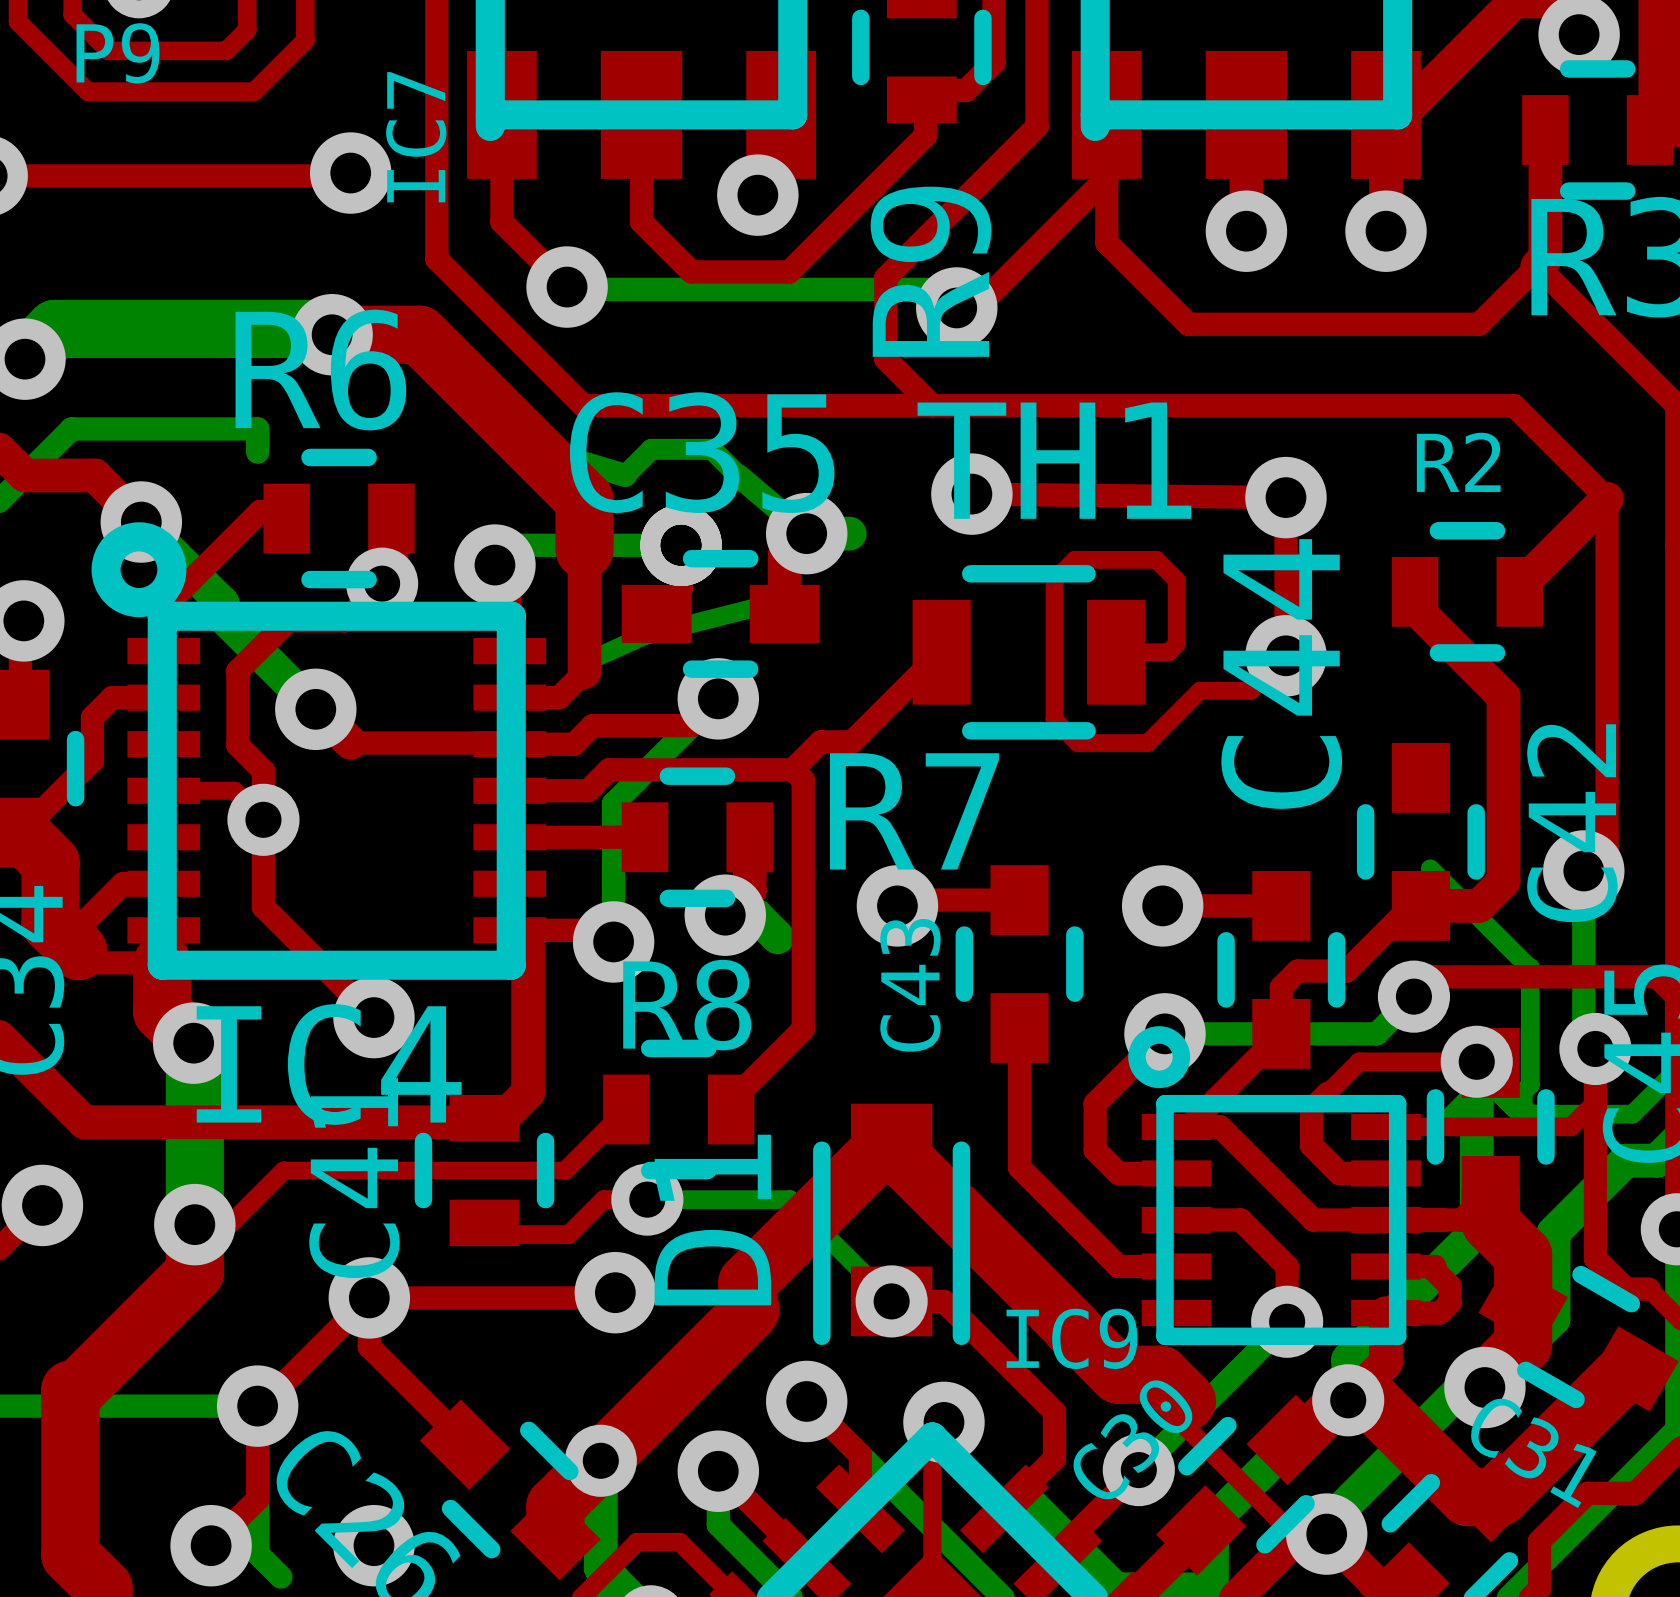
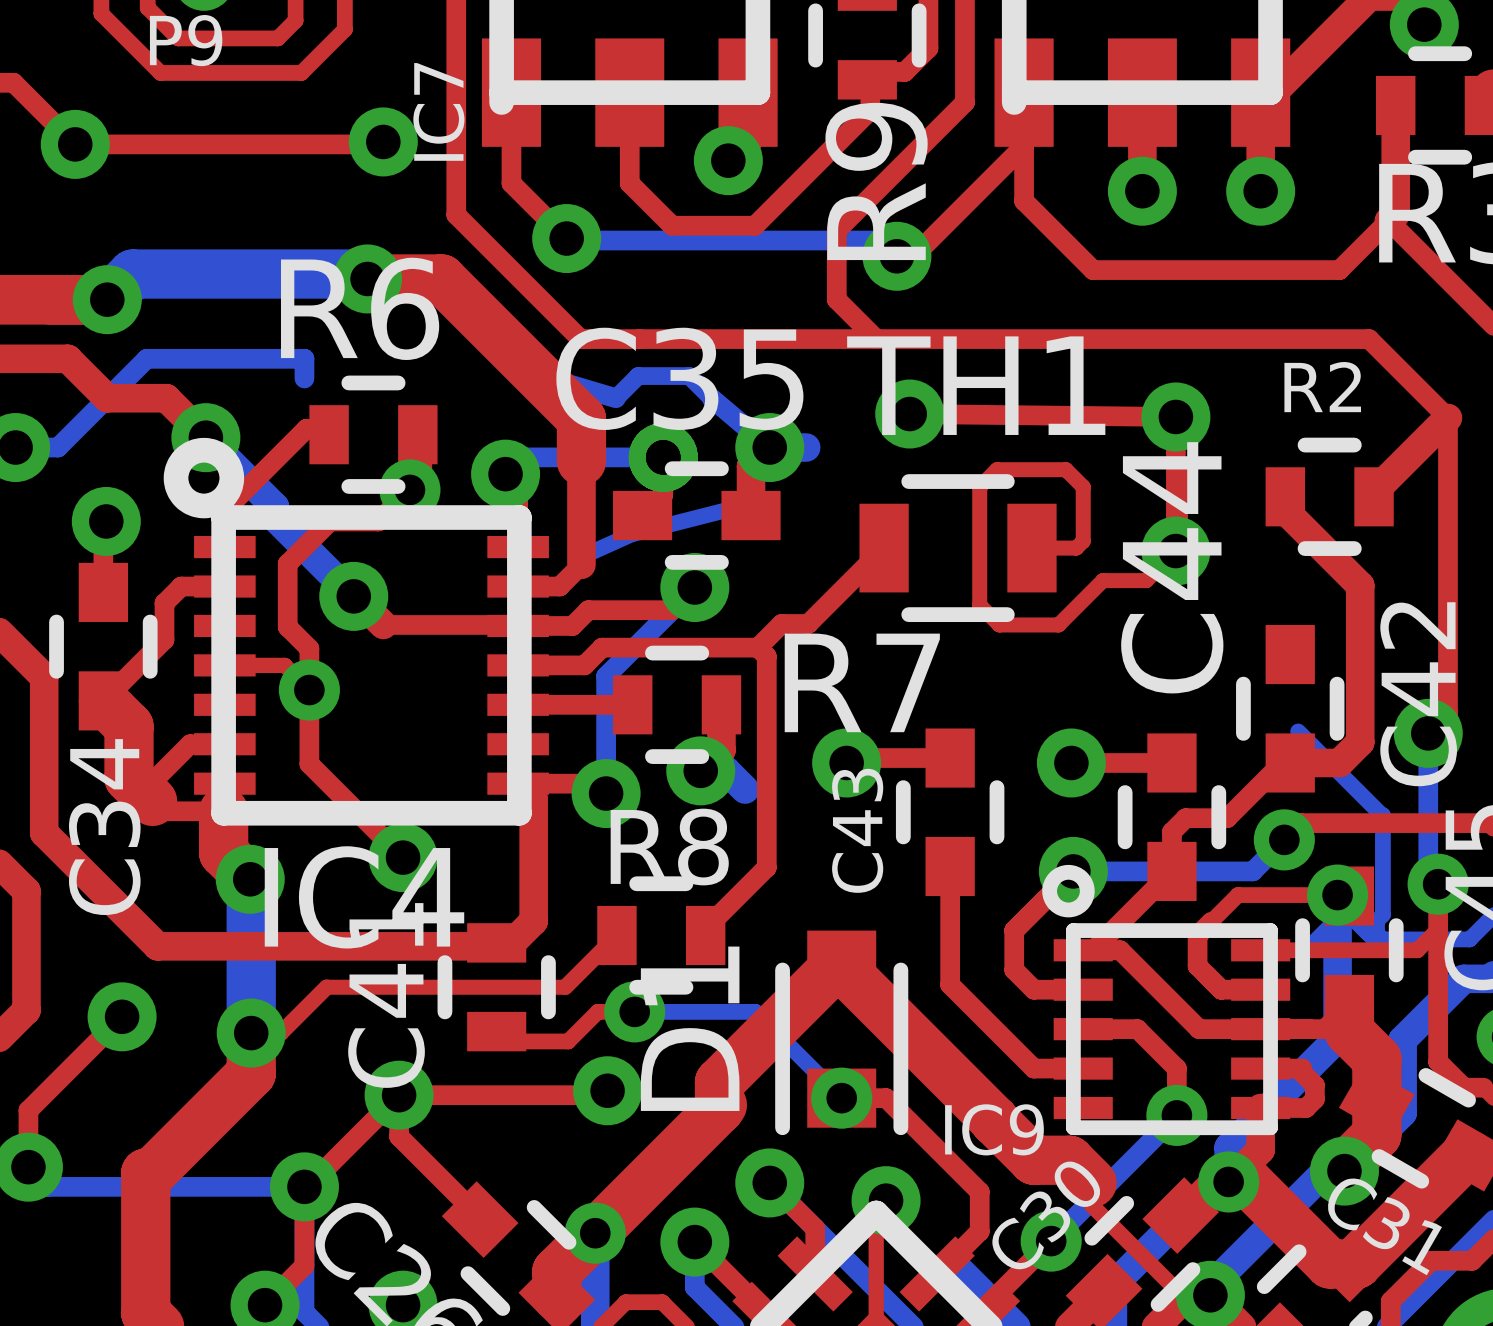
R9 name position: R9 (930, 271) -> R9 (876, 181)

